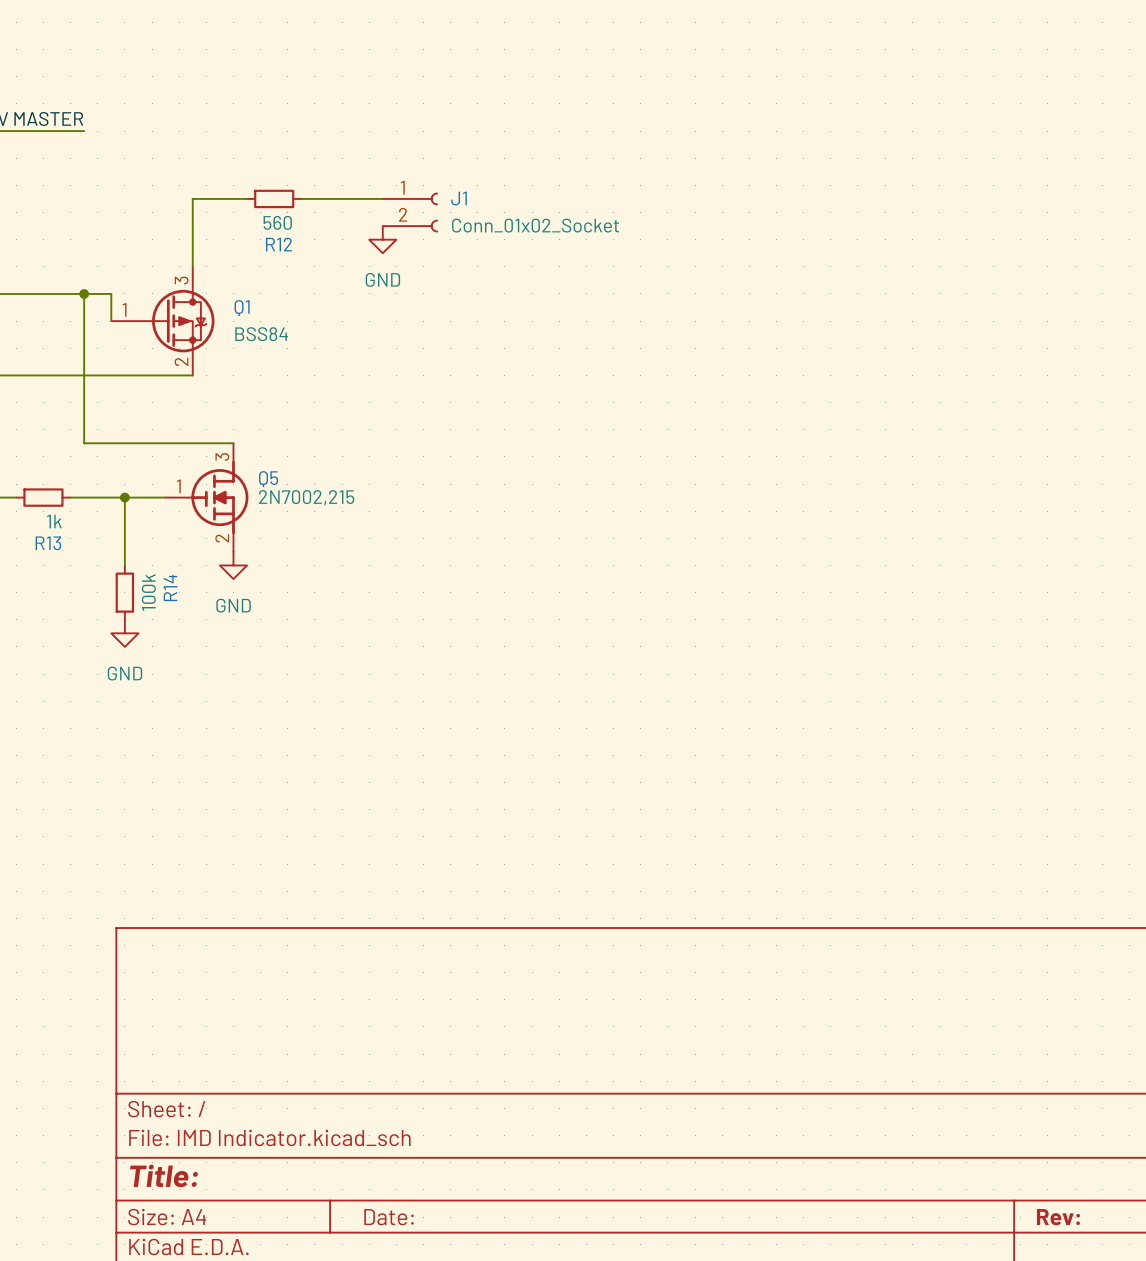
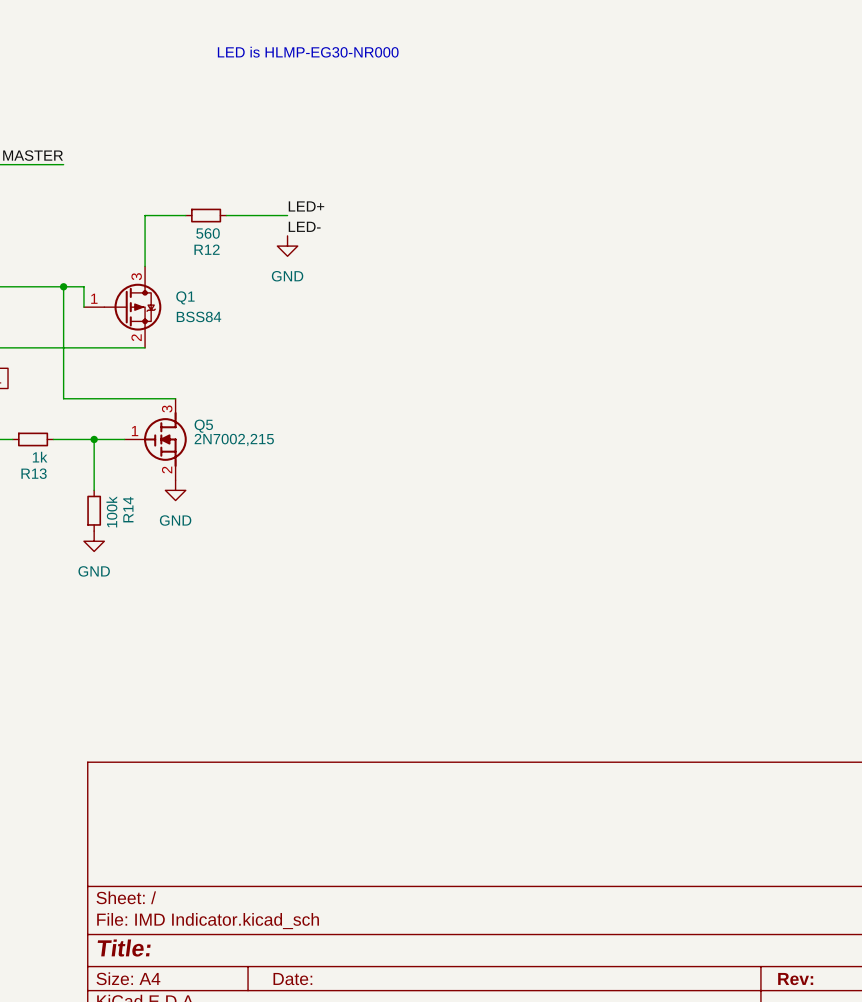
label: none -> LED+ (306, 206)
J1: Conn_01x02_Socket (410, 212) -> none
label: none -> LED- (304, 226)

